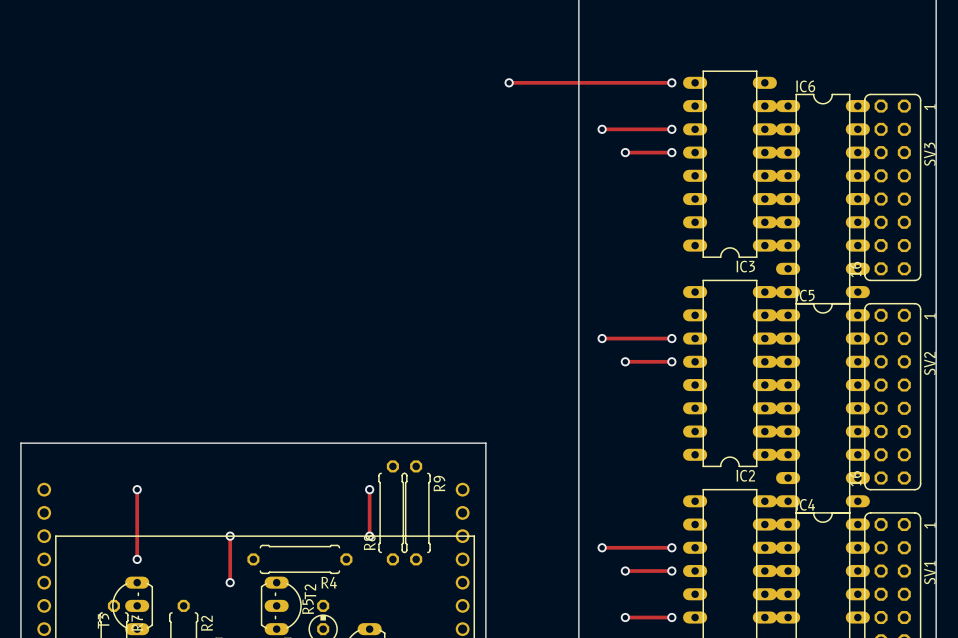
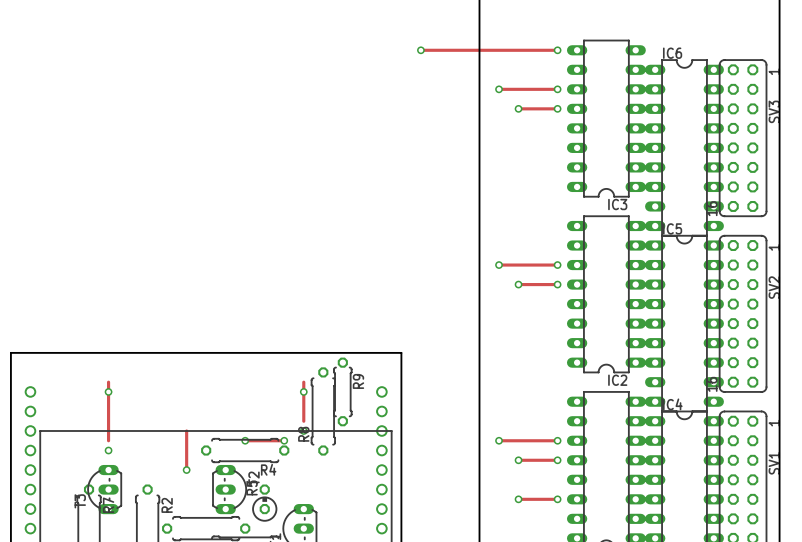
R9 footprint: [401, 460, 431, 566] -> [333, 357, 353, 427]
track: (369, 524) (369, 536) -> (303, 382) (303, 391)
via: (230, 536) -> none
track: (137, 547) (137, 559) -> (108, 382) (108, 391)
track: none -> (245, 440) (284, 440)
via: none -> (245, 440)
via: none -> (284, 440)

